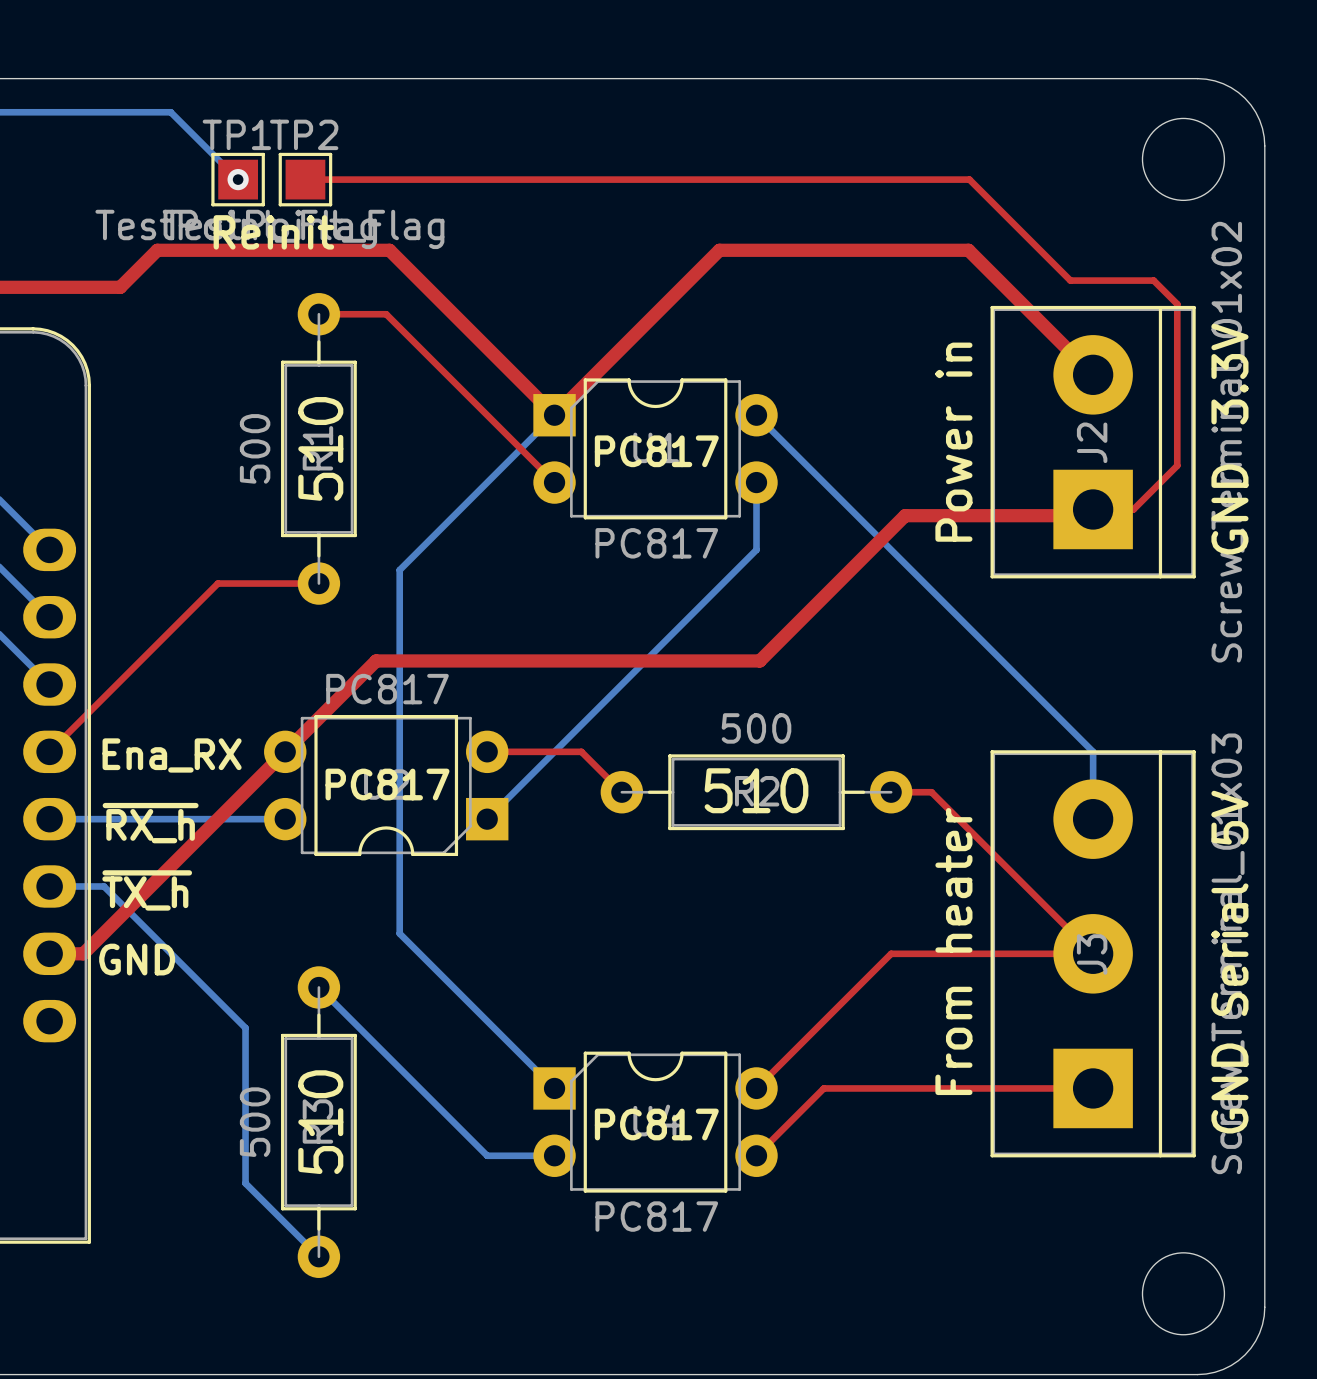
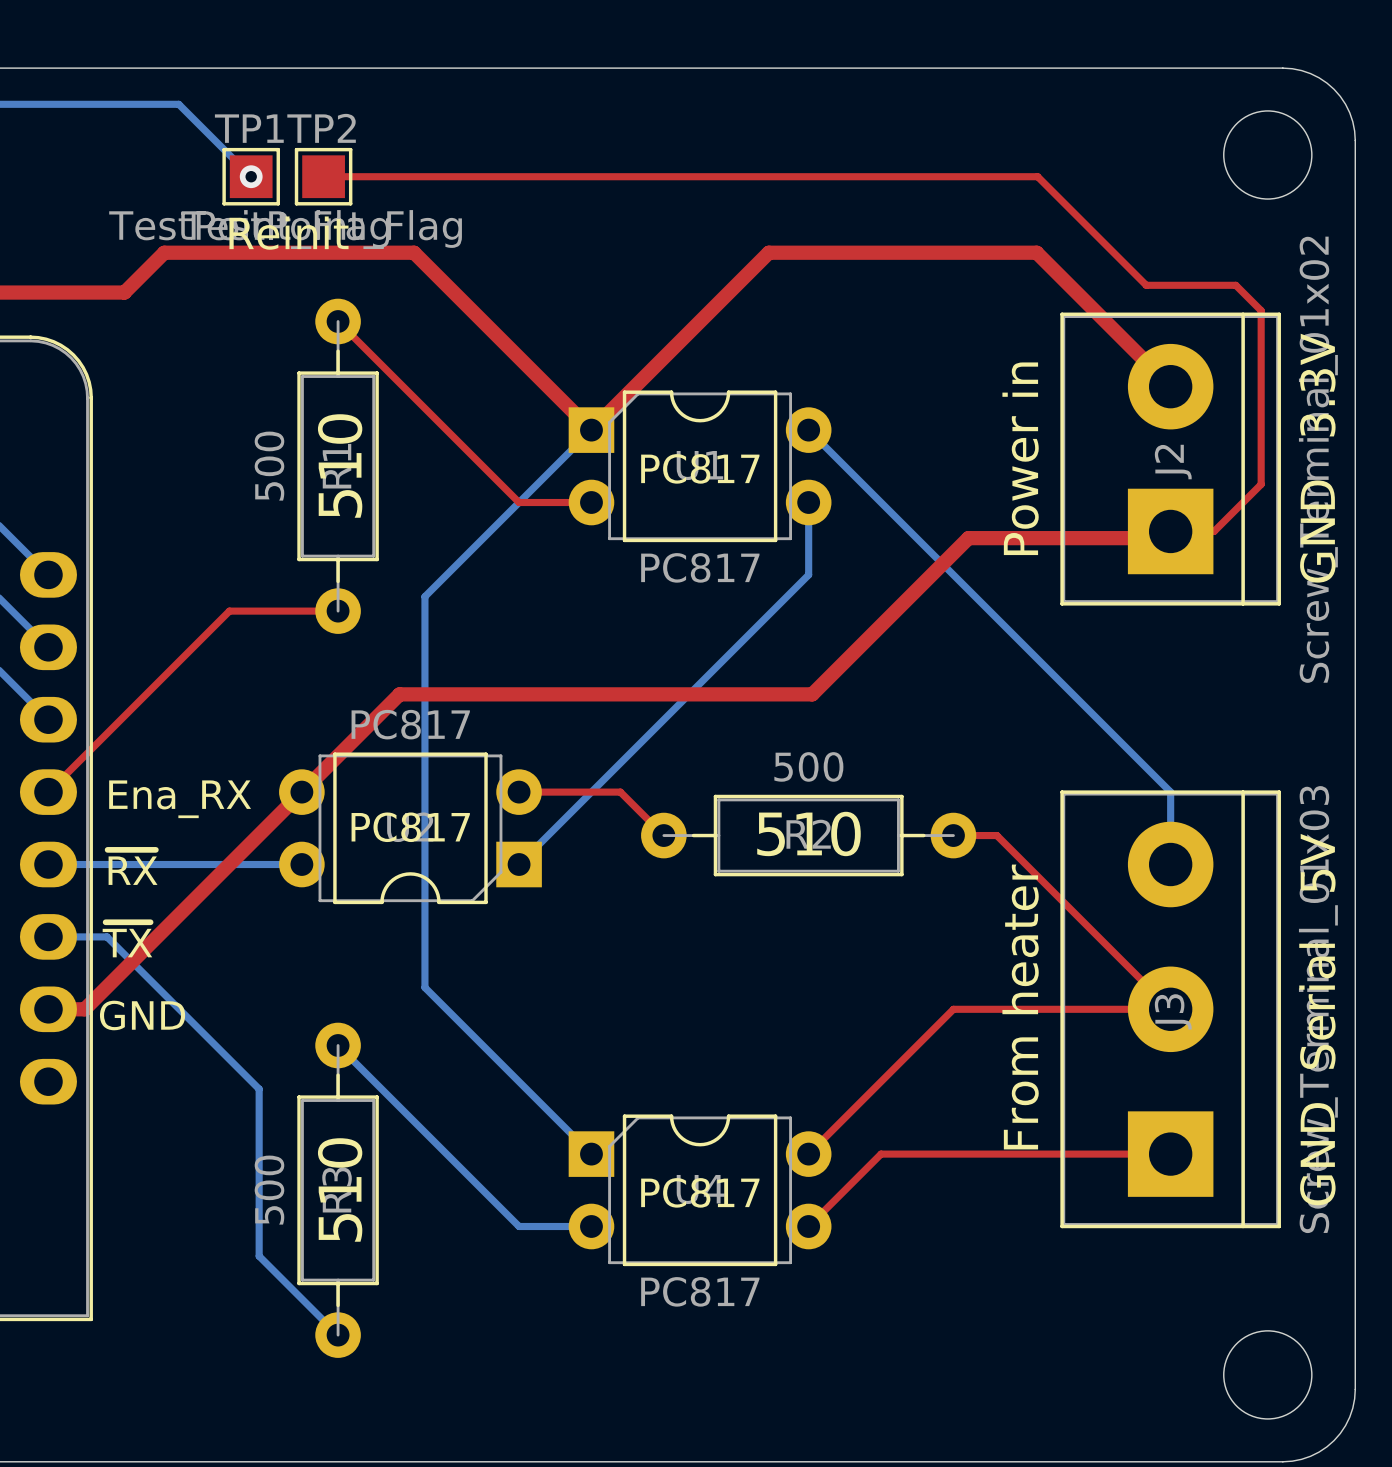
top track: (318, 314) (386, 314) (554, 482) -> (338, 321) (519, 502) (591, 502)
text: ~{RX_h} (150, 823) -> ~{RX} (132, 867)
text: ~{TX_h} (147, 890) -> ~{TX} (127, 939)

